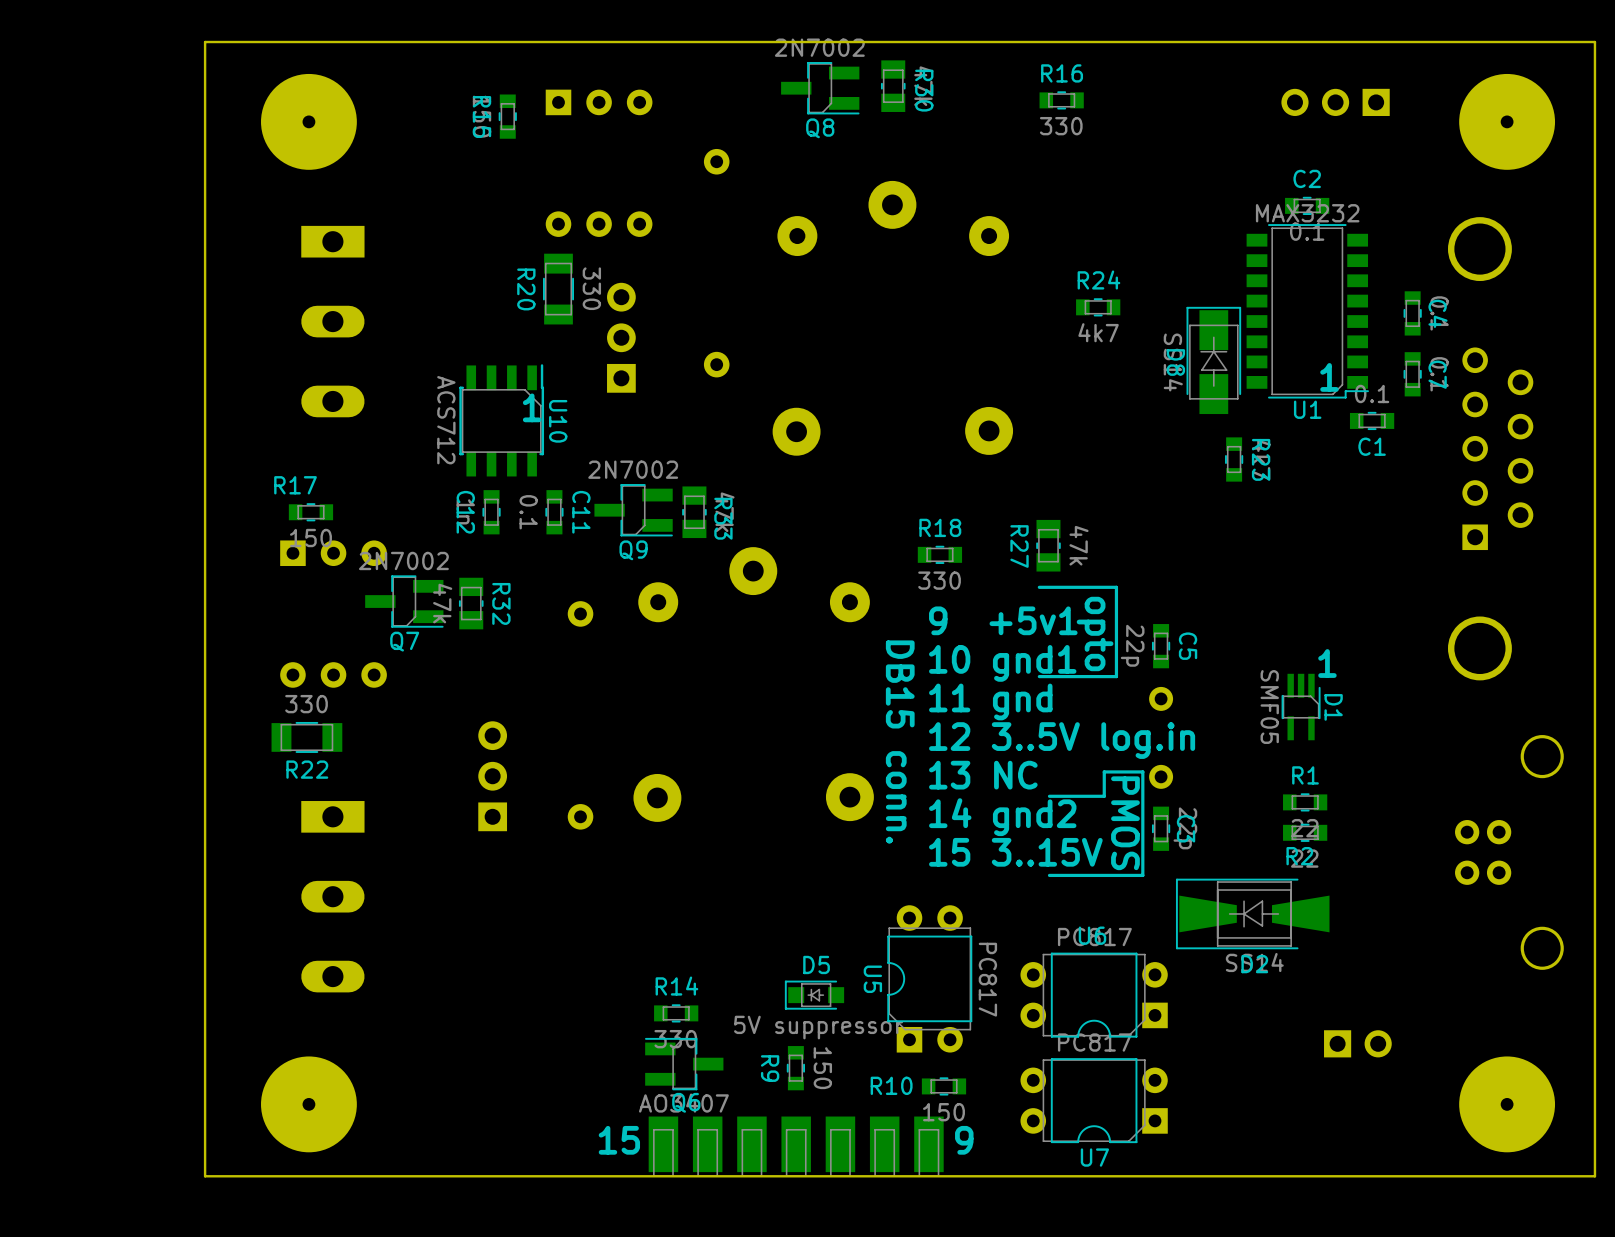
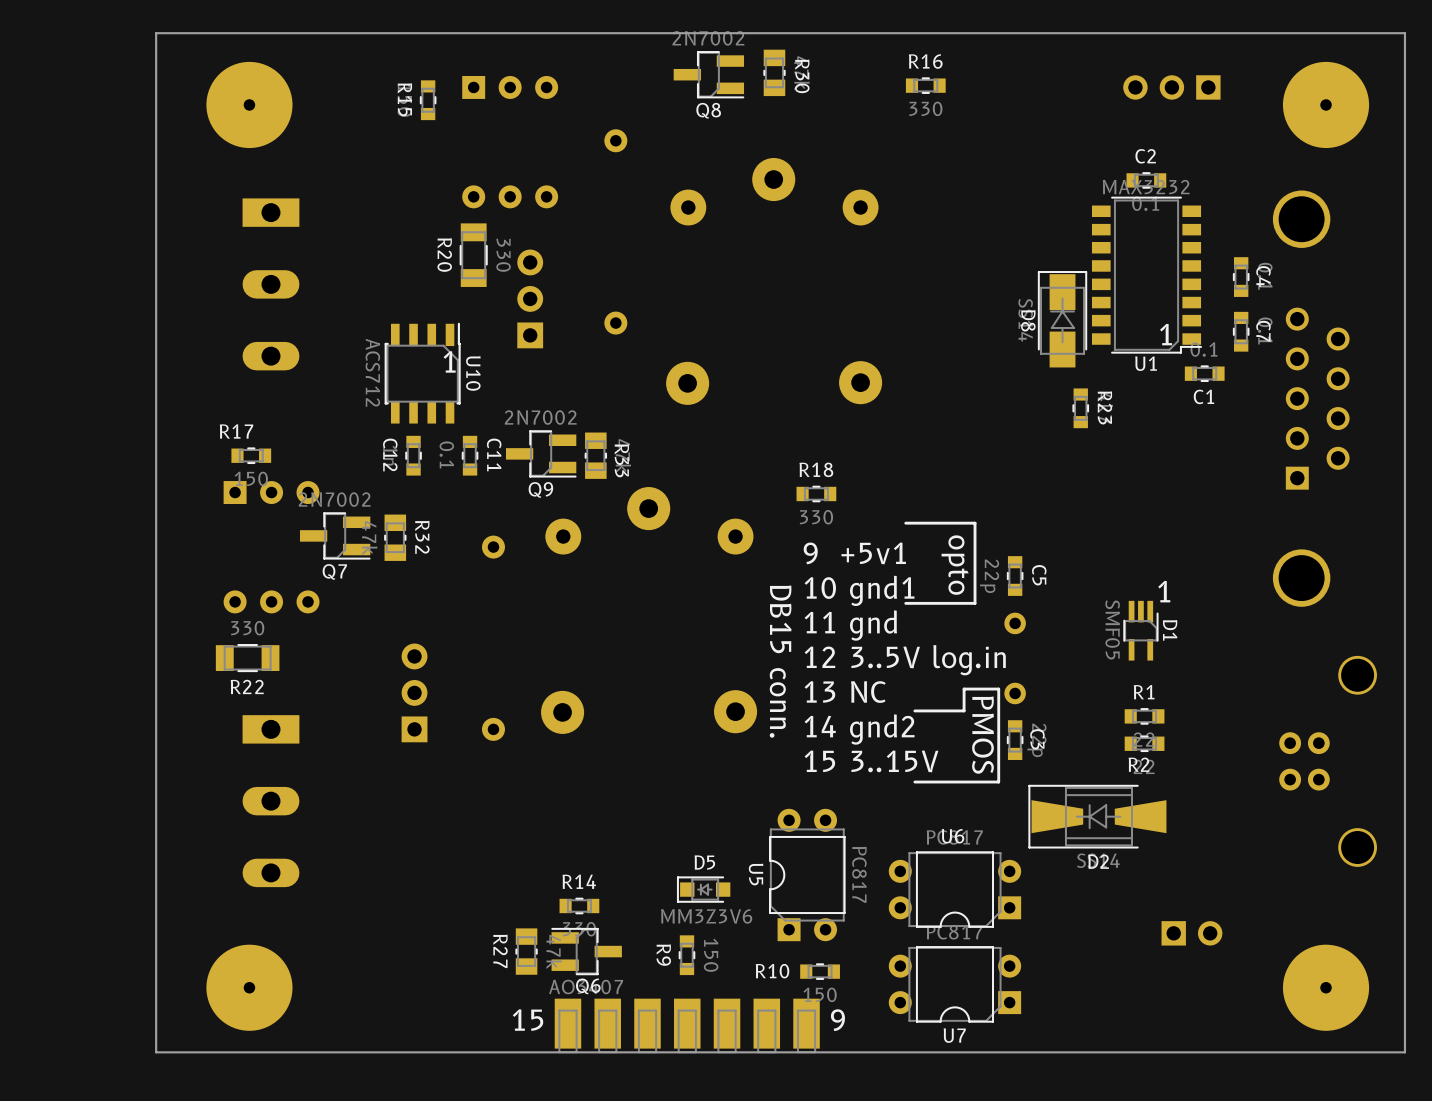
R24: 4k7 (1098, 307) -> none
R27 position: (1048, 545) -> (526, 951)
D5 value: 5V suppressor (818, 1027) -> MM3Z3V6 (706, 916)

